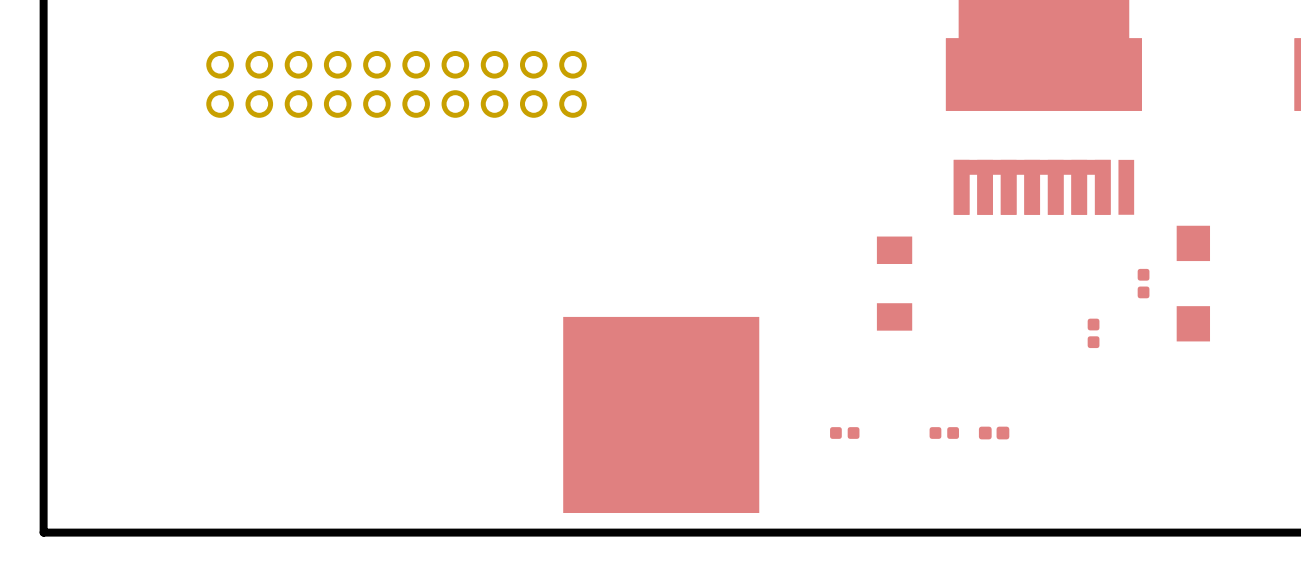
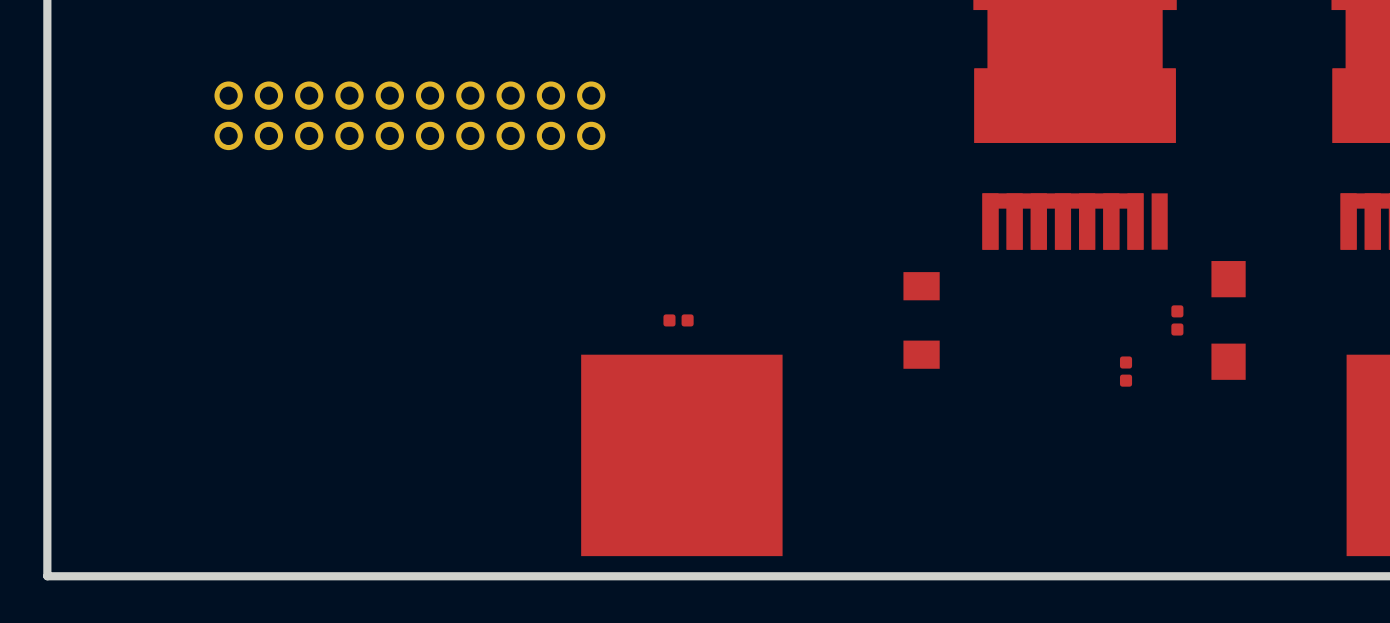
part: none -> (678, 320)
part: (844, 433) -> none
part: (944, 433) -> none
part: (994, 433) -> none

